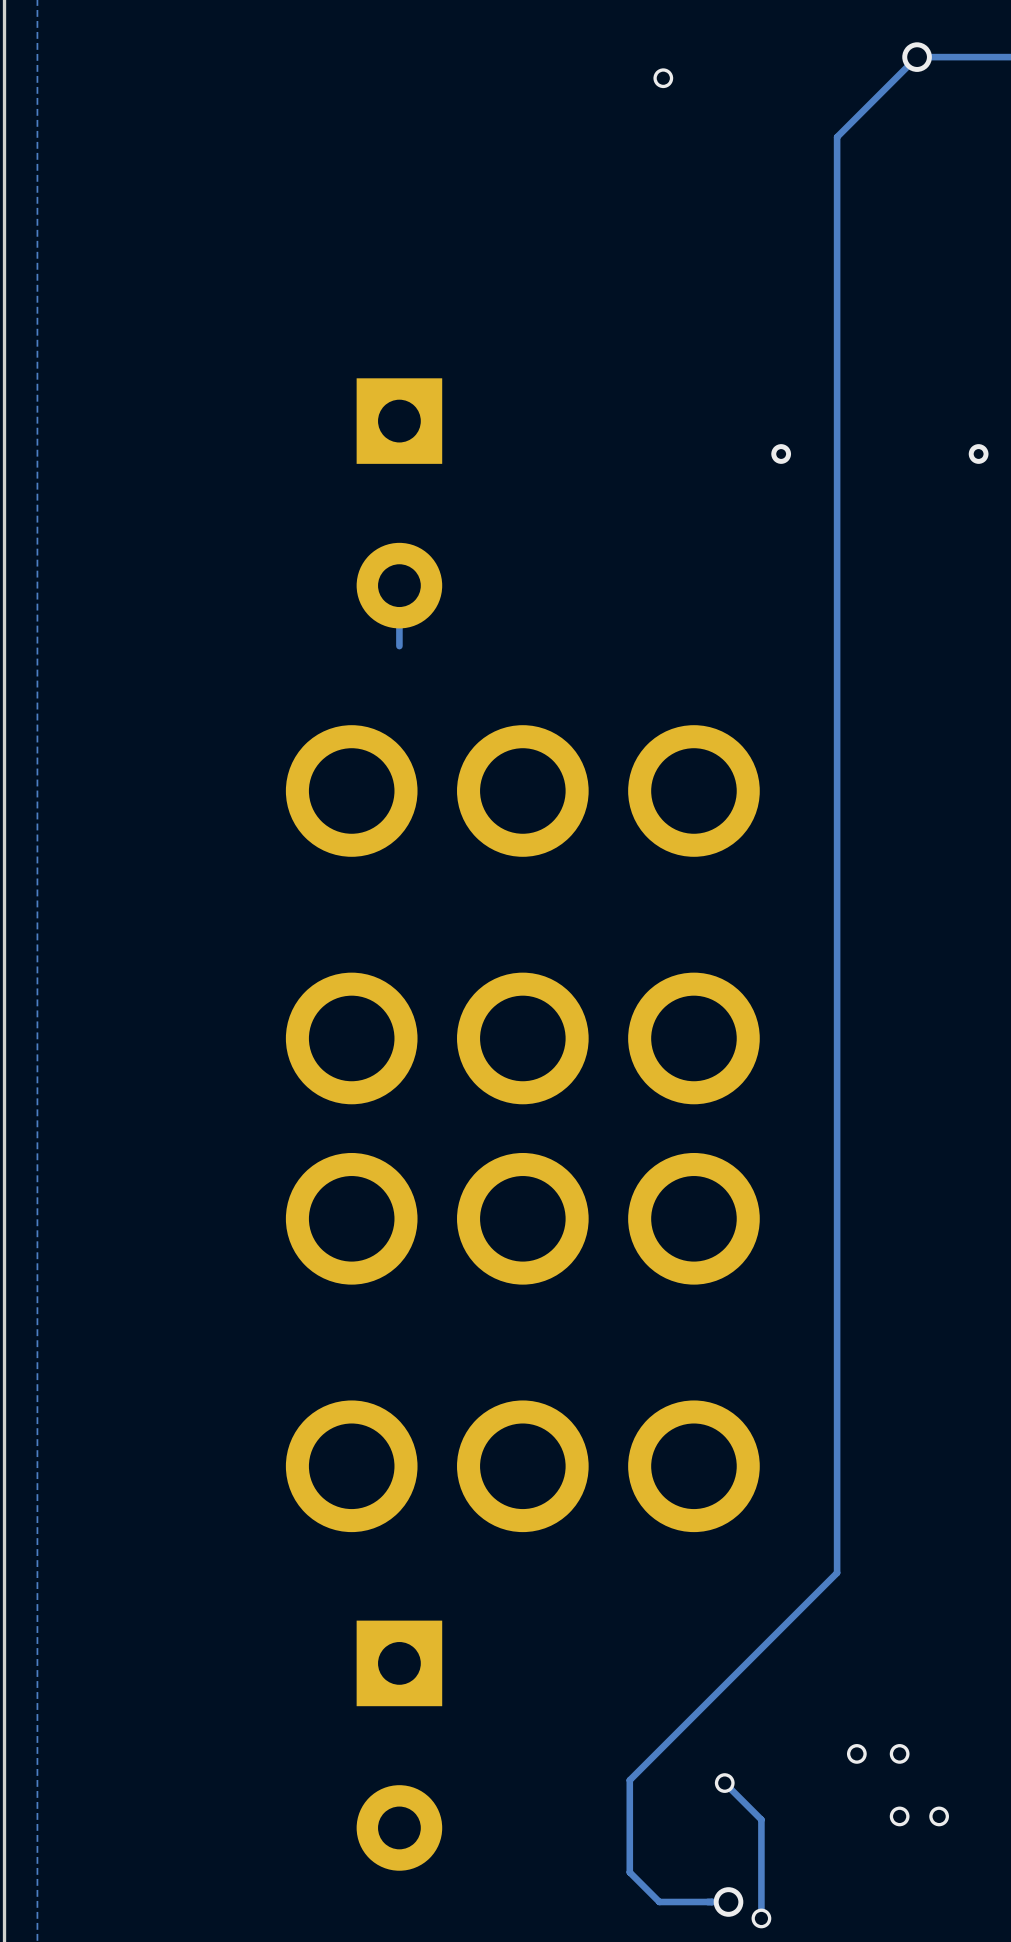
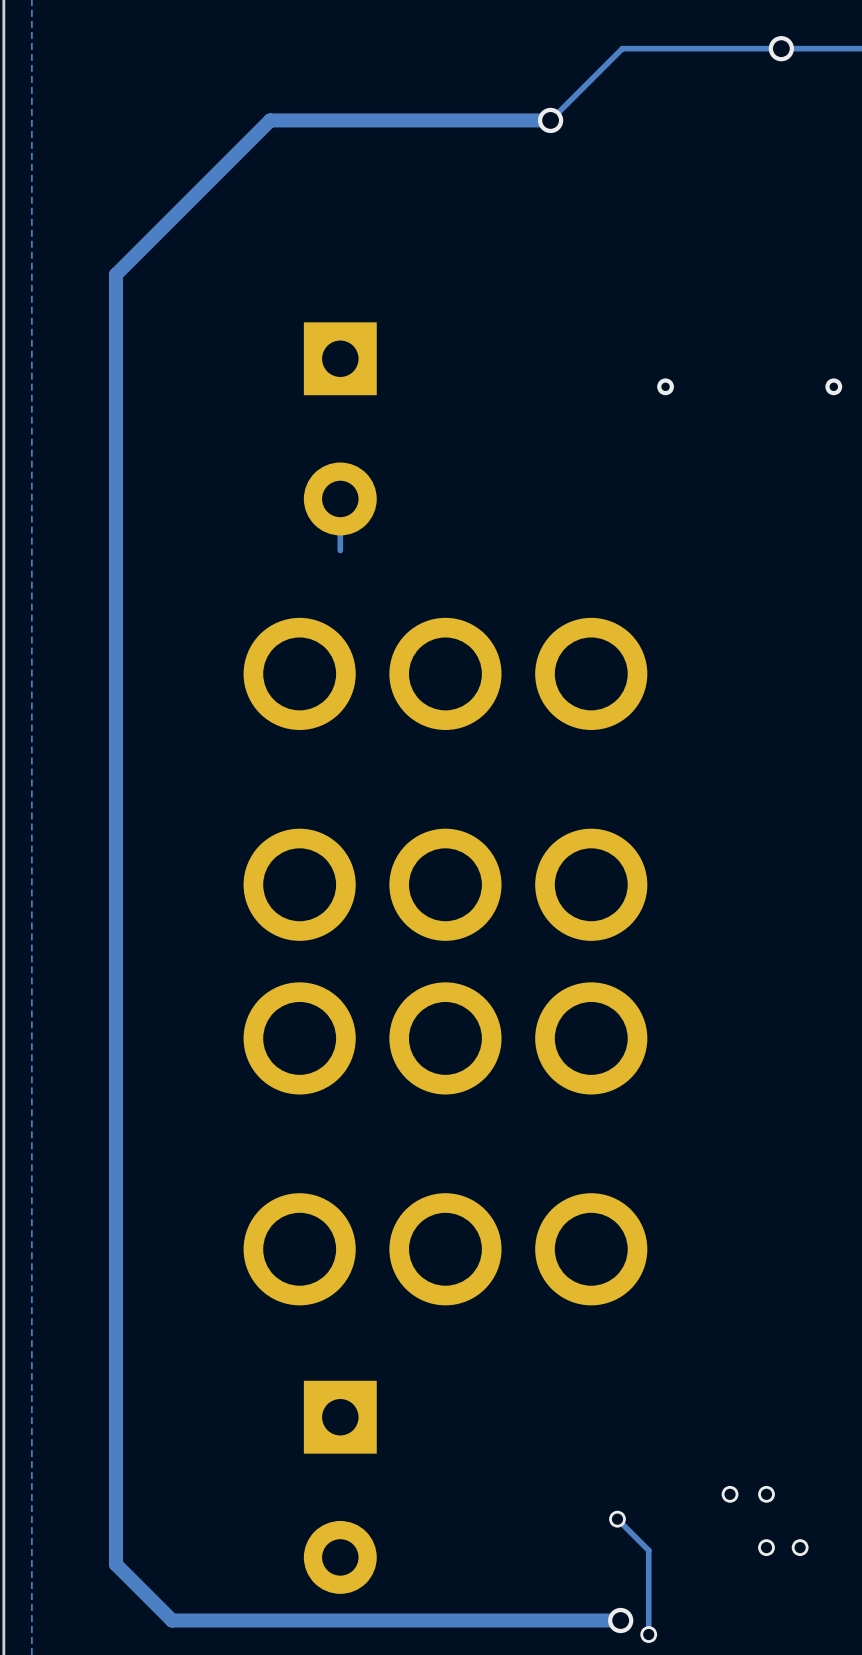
track: (917, 57) (837, 137) (837, 1572) (629, 1780) (629, 1872) (659, 1901) -> (781, 48) (622, 48) (550, 120) (270, 120) (116, 274) (116, 1564) (172, 1620) (561, 1620)
via: (663, 78) -> none
via: none -> (550, 120)
track width: thin (728, 1901) (659, 1901) -> thick (620, 1620) (561, 1620)

